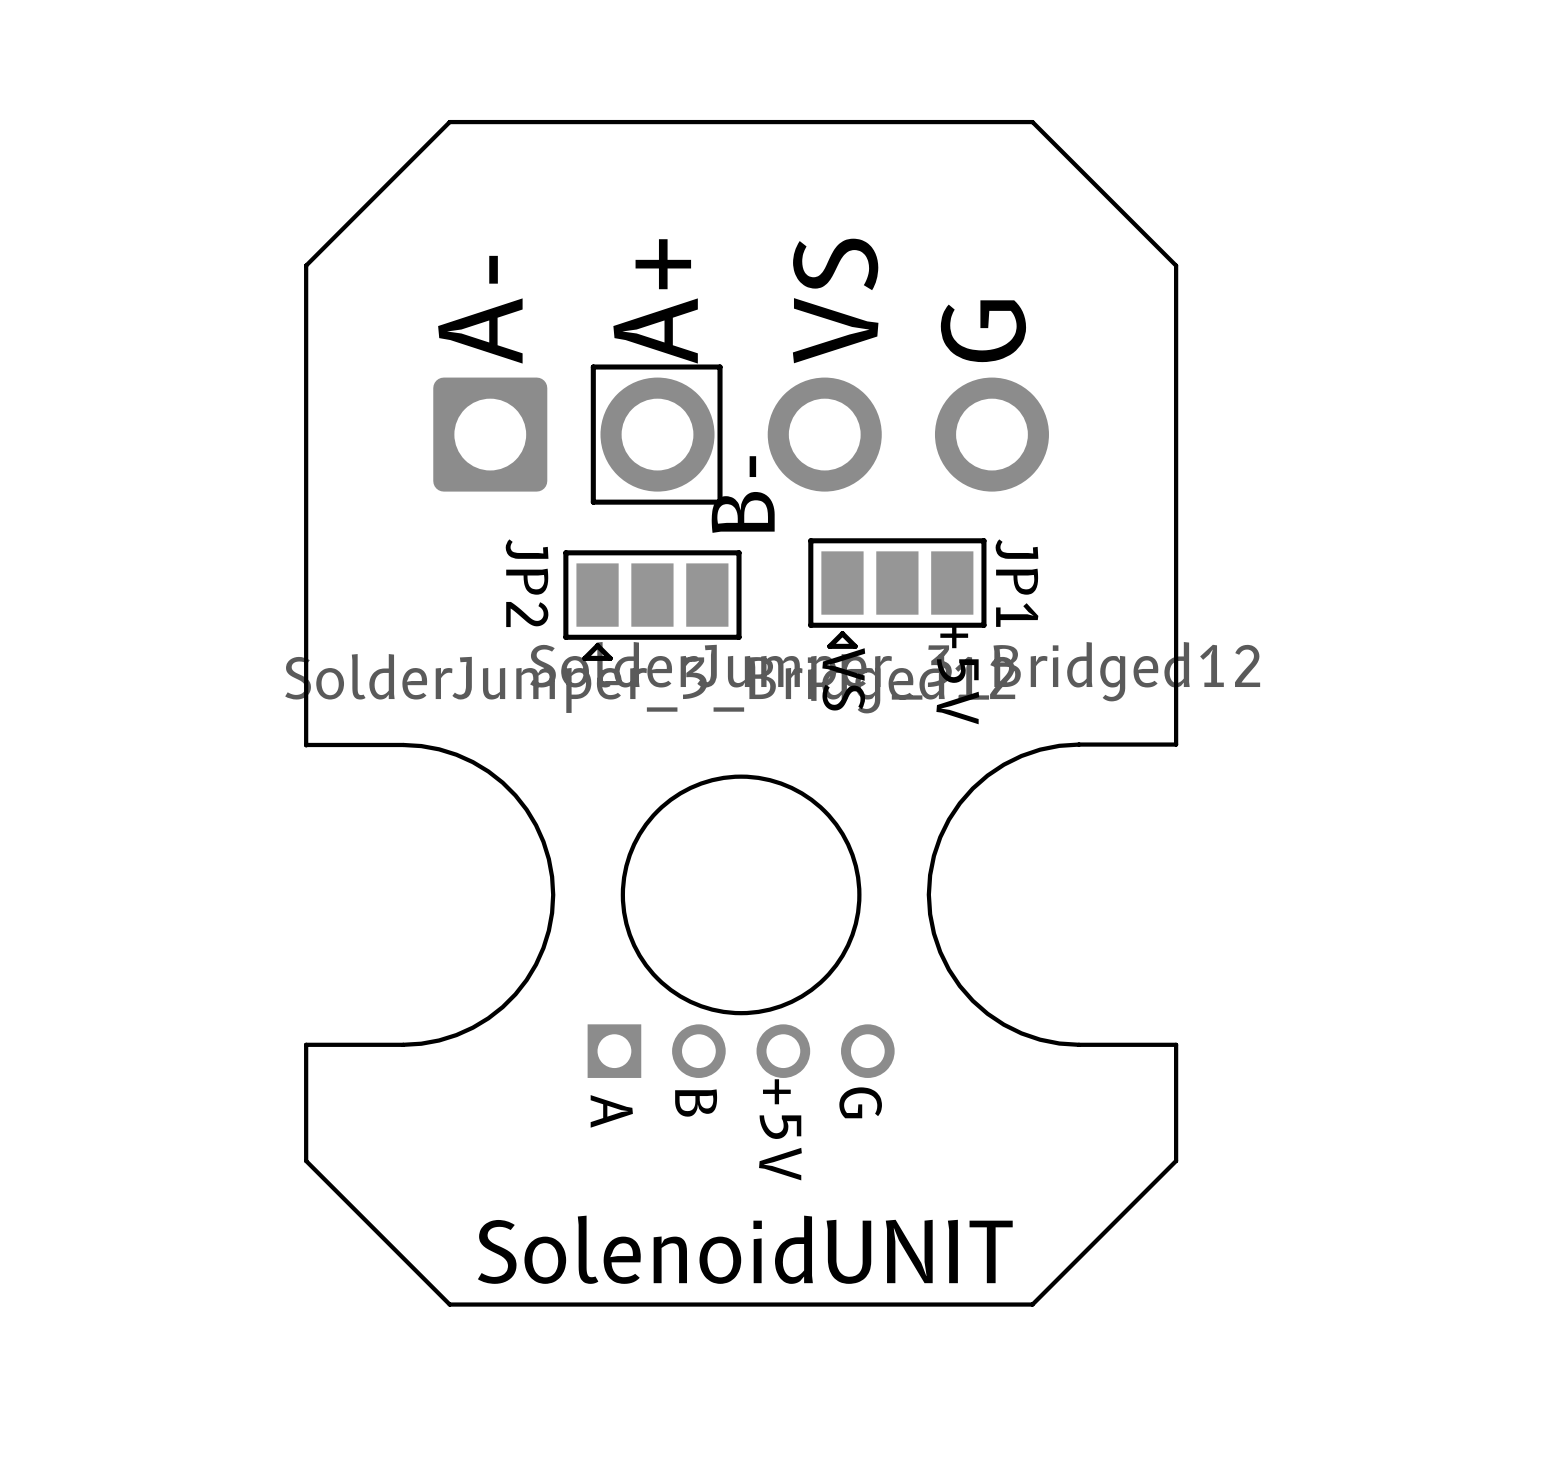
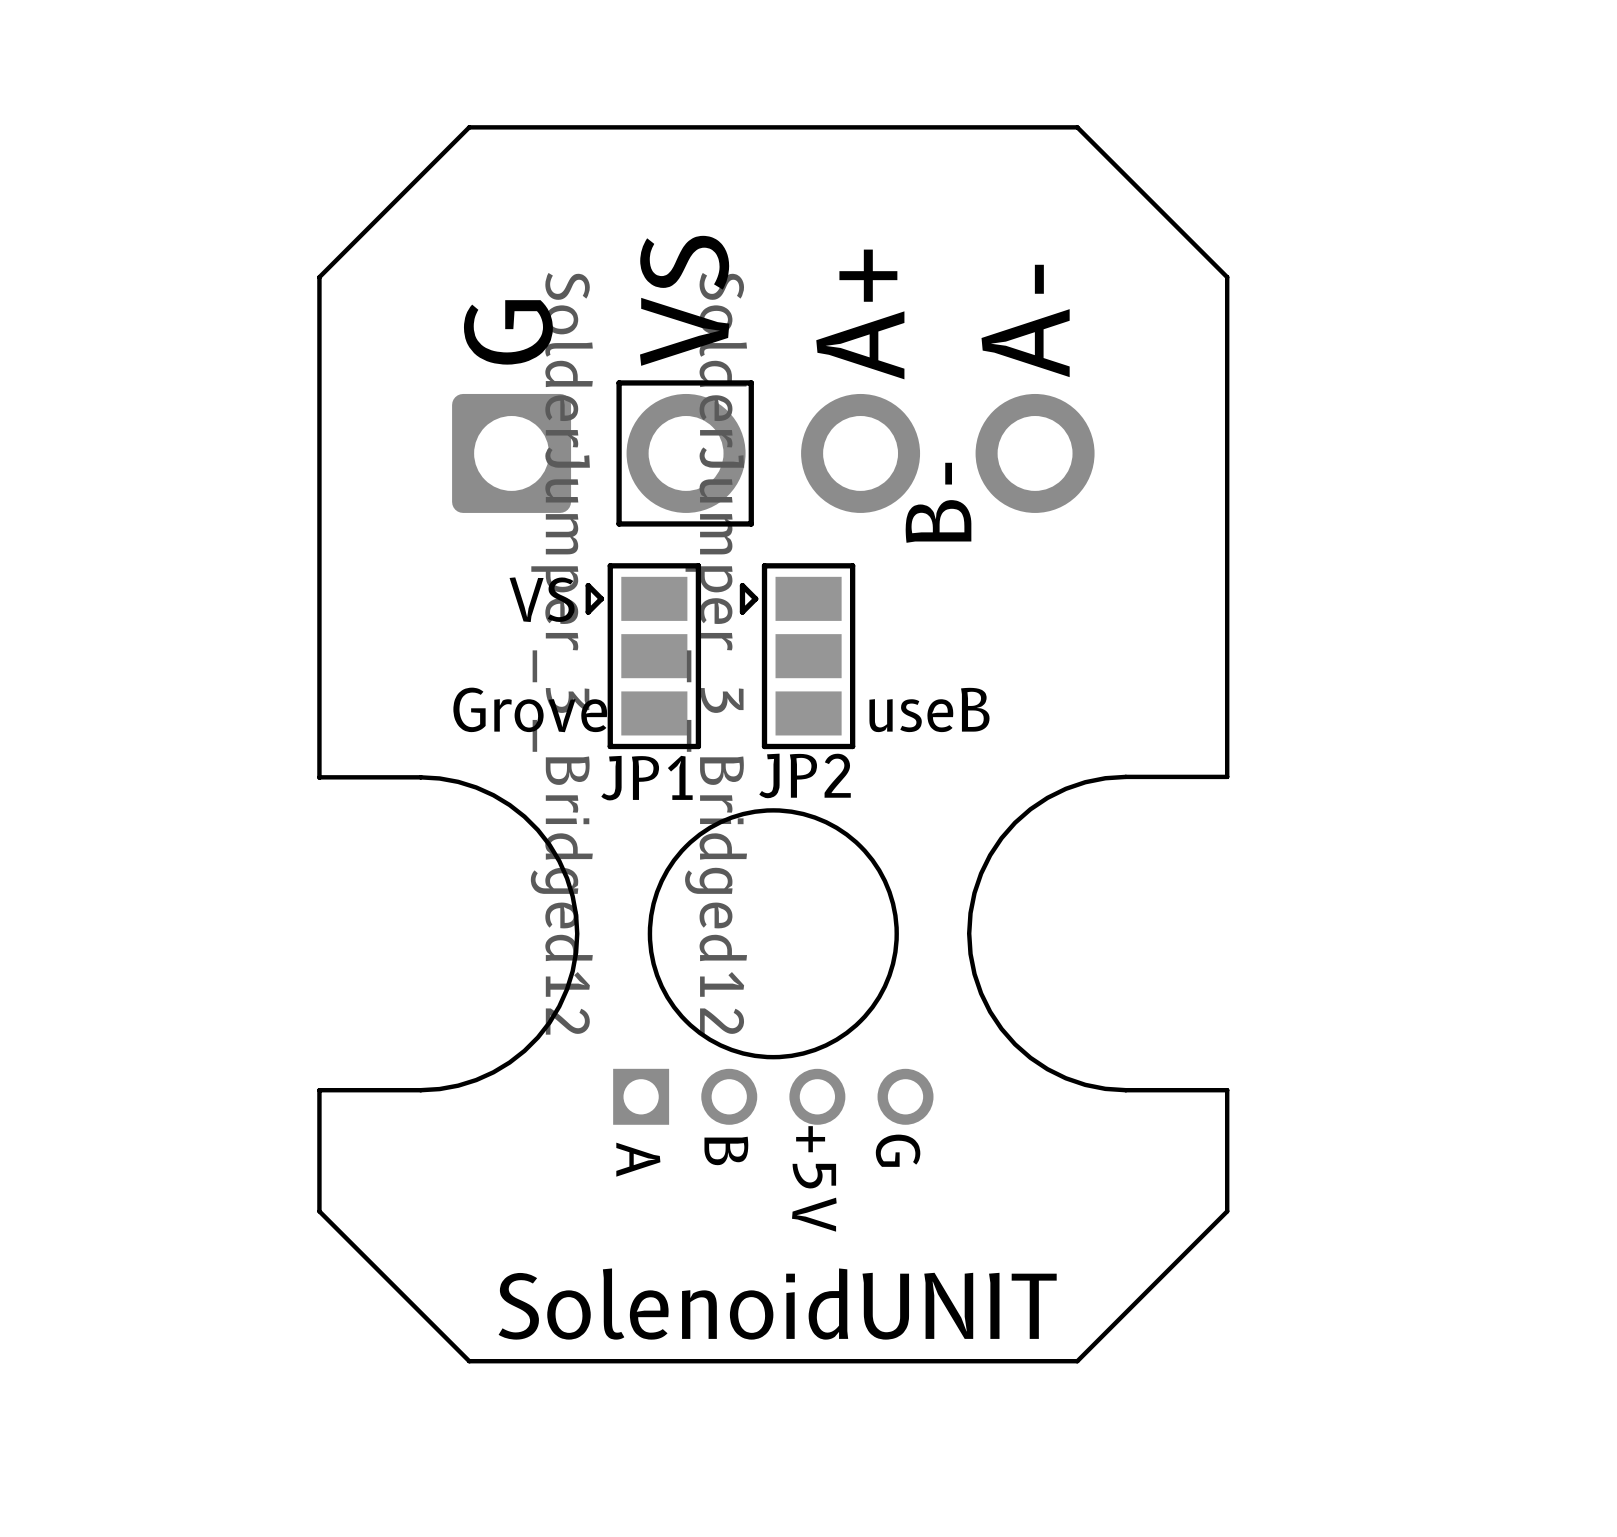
text: none -> VS (684, 300)
text: VS (835, 300) -> none
text position: A+ (655, 301) -> A+ (860, 314)
text: A- (480, 309) -> G (508, 332)
text: G (983, 331) -> A- (1025, 320)
text position: B- (743, 494) -> B- (938, 502)
text: none -> VS (542, 599)
JP2 name position: JP2 (527, 583) -> JP2 (805, 775)
JP1 rotation: 0° (897, 593) -> 90° clockwise (643, 656)
JP1 position: (897, 593) -> (643, 656)
JP2 rotation: 0° (652, 605) -> 90° clockwise (797, 656)
JP2 position: (652, 605) -> (797, 656)
text: +5V (957, 673) -> none
text: VS (843, 679) -> useB (929, 709)
text: none -> Grove (530, 709)

